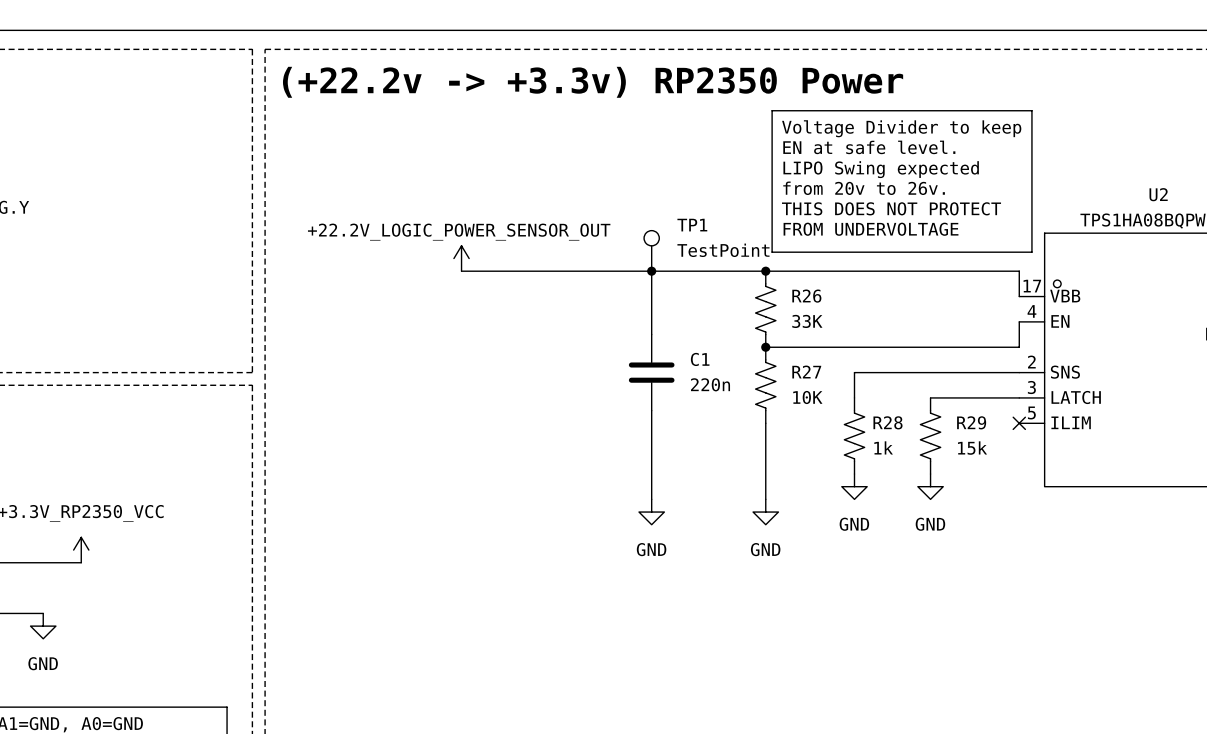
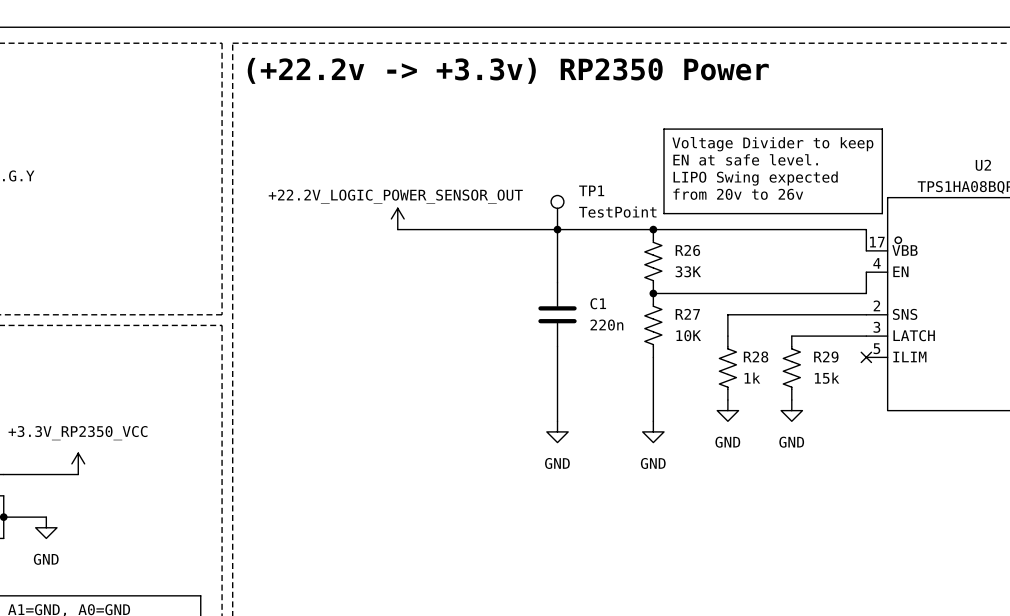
text: Voltage Divider to keep (901, 128) -> none
text: EN at safe level. (869, 147) -> none
text: LIPO Swing expected (881, 169) -> Voltage Divider to keep (772, 144)
text: from 20v to 26v. (864, 188) -> EN at safe level. (745, 159)
text: THIS DOES NOT PROTECT (891, 208) -> LIPO Swing expected (755, 178)
text: FROM UNDERVOLTAGE (871, 229) -> from 20v to 26v (738, 194)
line: (778, 252) (772, 252) (772, 110) (1031, 110) (1031, 252) -> (664, 213) (664, 129) (882, 129) (882, 213) (876, 213)

